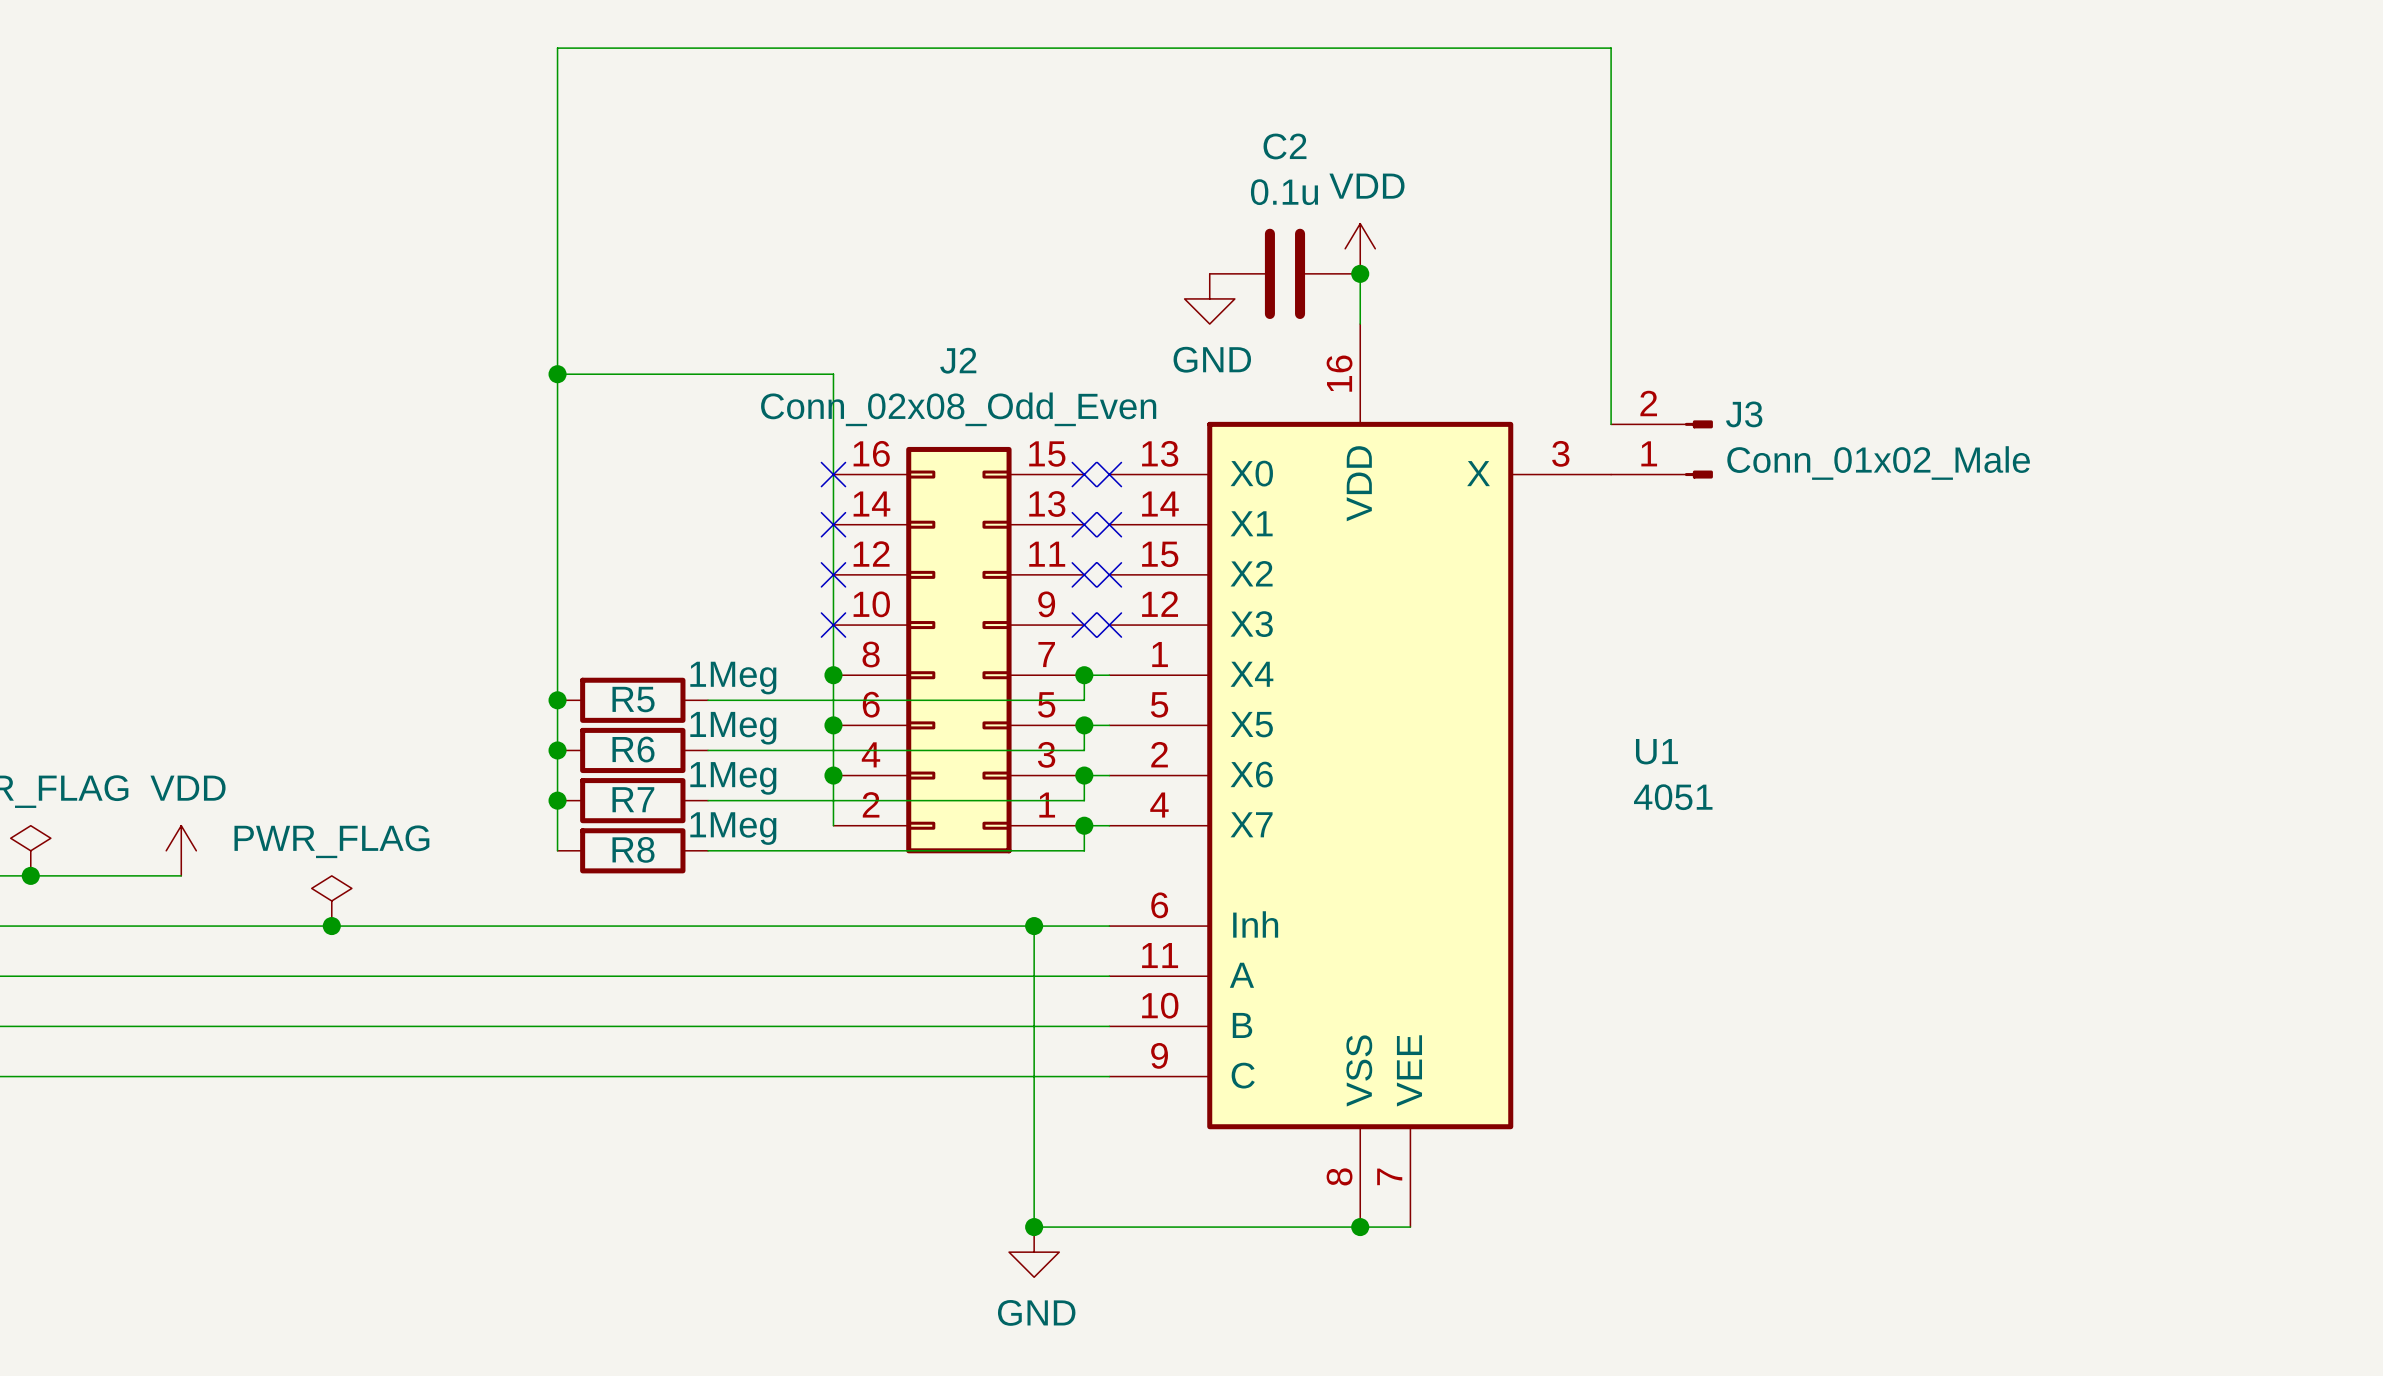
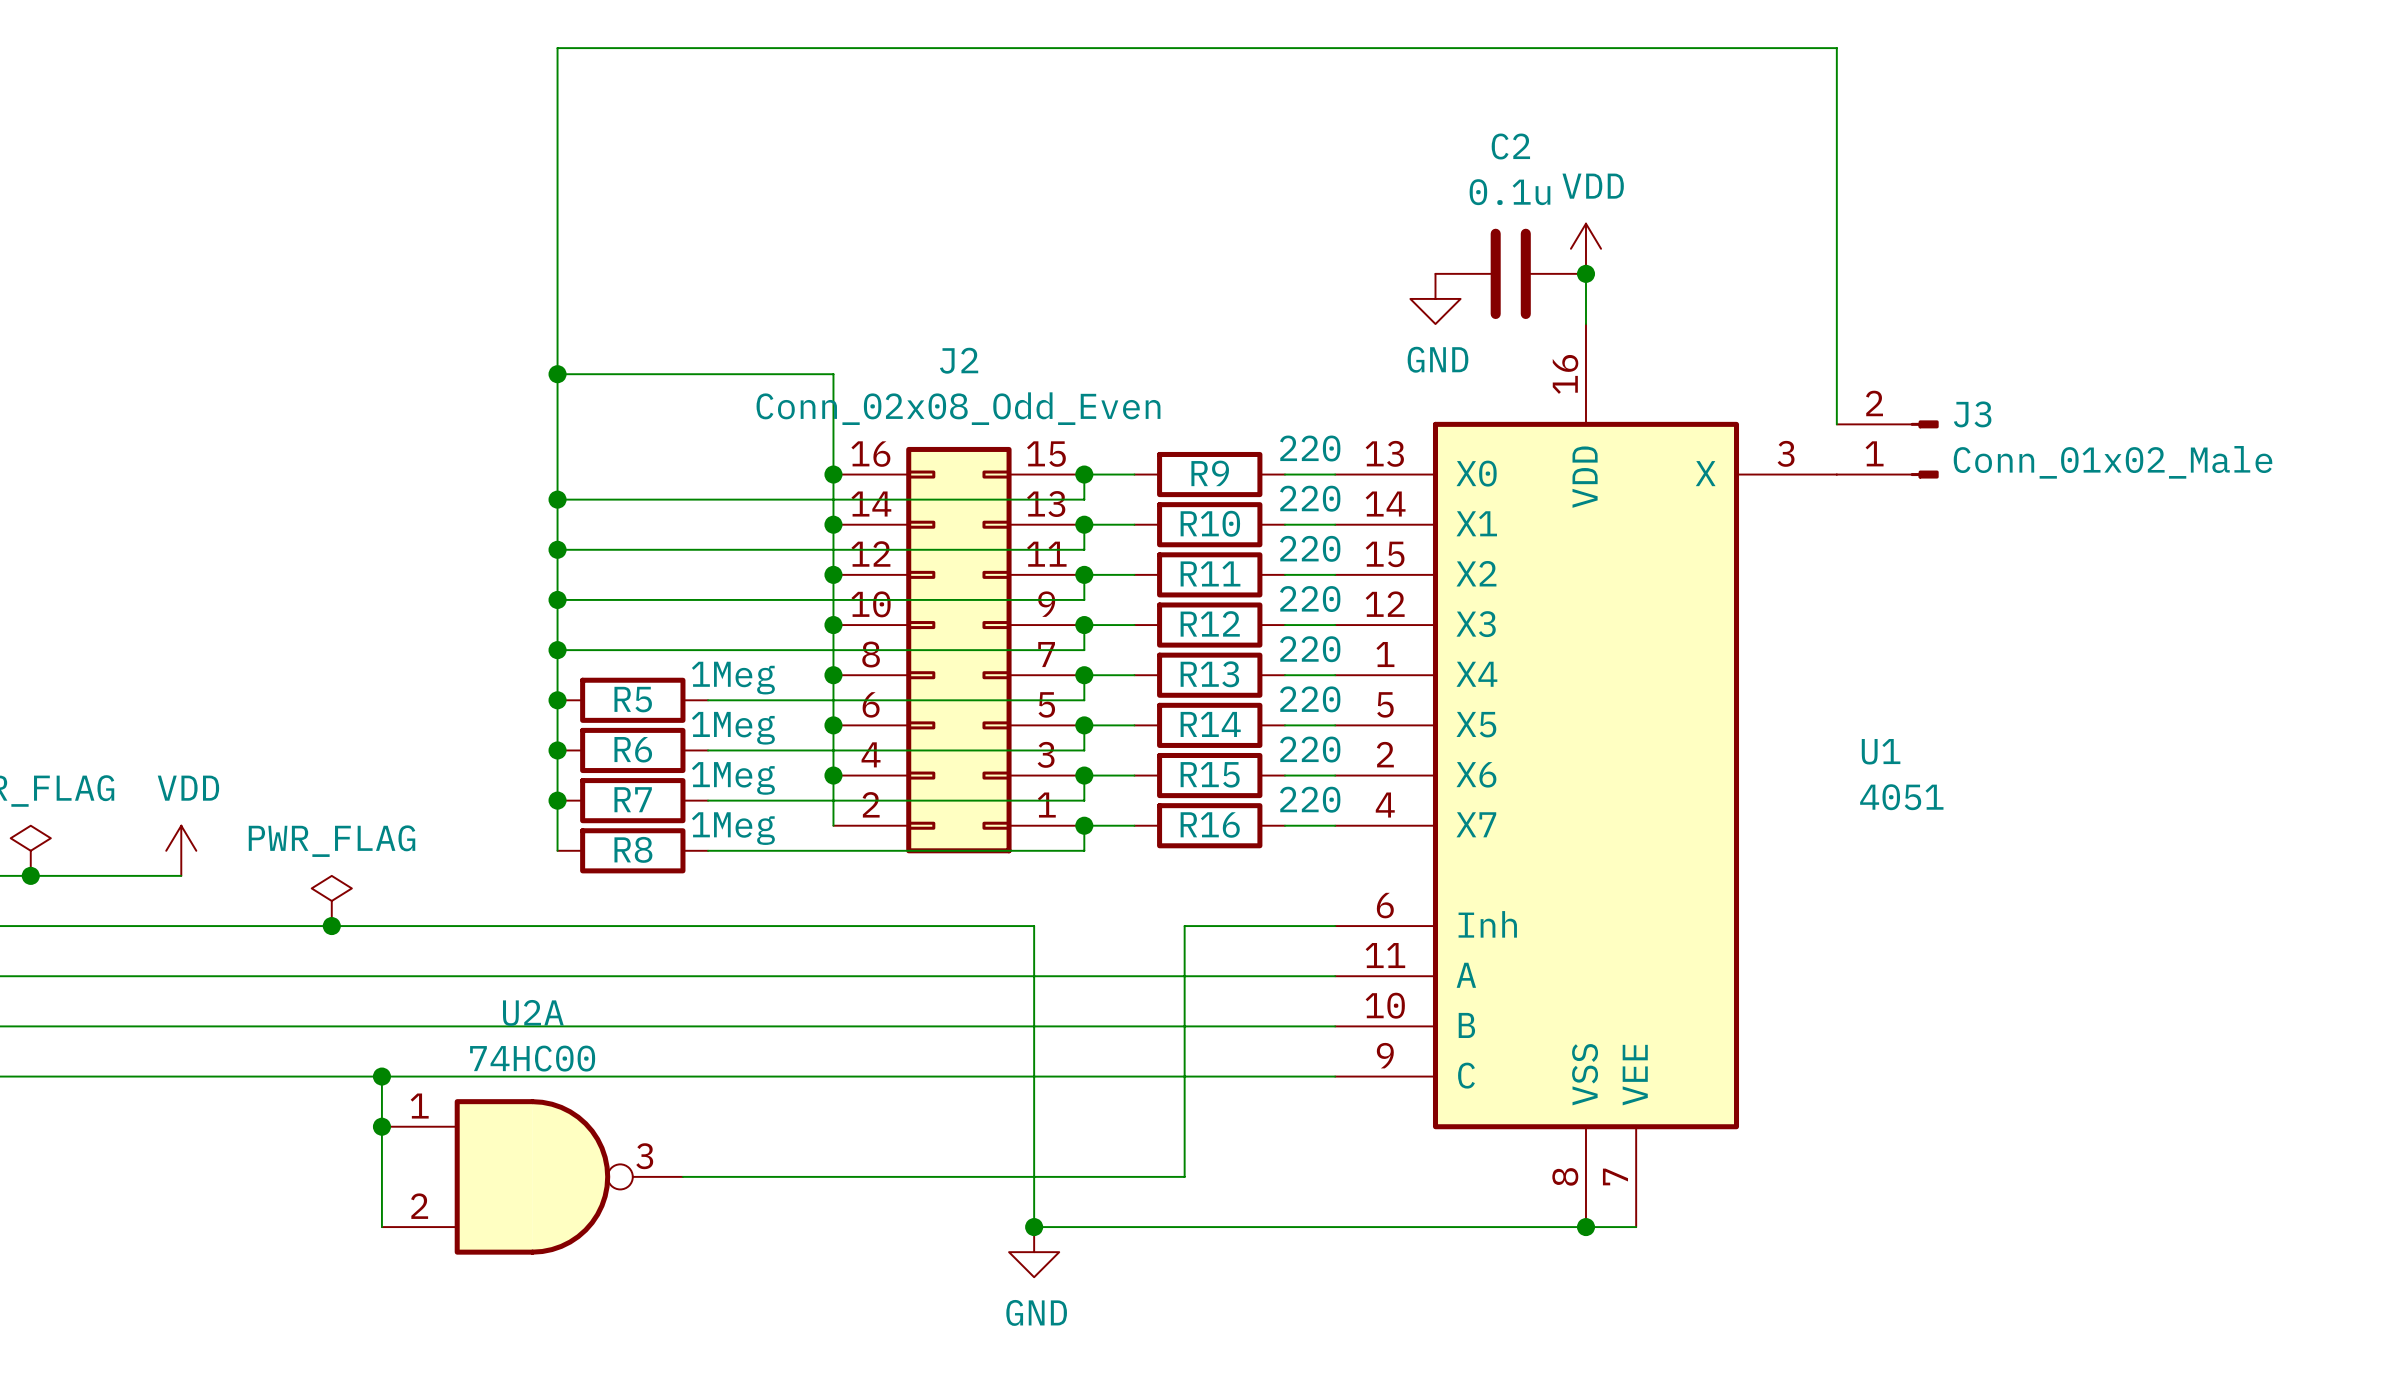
wire: (1611, 48) (1611, 424) -> (1611, 48) (1836, 48) (1836, 424)
power symbol position: VDD (1360, 248) -> VDD (1586, 248)
C2 position: (1284, 273) -> (1510, 273)
wire: (1360, 273) (1360, 324) -> (1586, 273) (1586, 324)
junction: (1360, 273) -> none
junction: none -> (1586, 273)
power symbol position: GND (1209, 298) -> GND (1435, 298)
J3 position: (1662, 449) -> (1887, 449)
junction: none -> (833, 474)
no-connect mark: (833, 474) -> none
junction: none -> (1084, 474)
no-connect mark: (1084, 474) -> none
no-connect mark: (1109, 474) -> none
wire: none -> (1134, 474) (1084, 474) (1084, 499) (557, 499)
R9: none -> 220 (1209, 474)
junction: none -> (557, 499)
junction: none -> (833, 524)
no-connect mark: (833, 524) -> none
junction: none -> (1084, 524)
no-connect mark: (1084, 524) -> none
no-connect mark: (1109, 524) -> none
wire: none -> (1134, 524) (1084, 524) (1084, 549) (557, 549)
R10: none -> 220 (1209, 524)
junction: none -> (557, 549)
junction: none -> (833, 574)
no-connect mark: (833, 574) -> none
junction: none -> (1084, 574)
no-connect mark: (1084, 574) -> none
no-connect mark: (1109, 574) -> none
wire: none -> (1134, 574) (1084, 574) (1084, 599) (557, 599)
R11: none -> 220 (1209, 574)
junction: none -> (557, 599)
junction: none -> (833, 625)
no-connect mark: (833, 625) -> none
junction: none -> (1084, 625)
no-connect mark: (1084, 625) -> none
no-connect mark: (1109, 625) -> none
wire: none -> (1134, 625) (1084, 625) (1084, 650) (557, 650)
R12: none -> 220 (1209, 625)
junction: none -> (557, 650)
R13: none -> 220 (1209, 675)
R14: none -> 220 (1209, 725)
R15: none -> 220 (1209, 775)
U1 position: (1360, 775) -> (1586, 775)
R16: none -> 220 (1209, 825)
wire: (1034, 926) (1109, 926) -> none
junction: (1034, 926) -> none
wire: none -> (1335, 926) (1184, 926) (1184, 1176) (682, 1176)
wire: none -> (381, 1076) (381, 1227)
junction: none -> (381, 1076)
junction: none -> (381, 1126)
U2A: none -> 74HC00 (532, 1176)
junction: (1360, 1227) -> none
wire: none -> (1410, 1227) (1636, 1227)
junction: none -> (1586, 1227)

